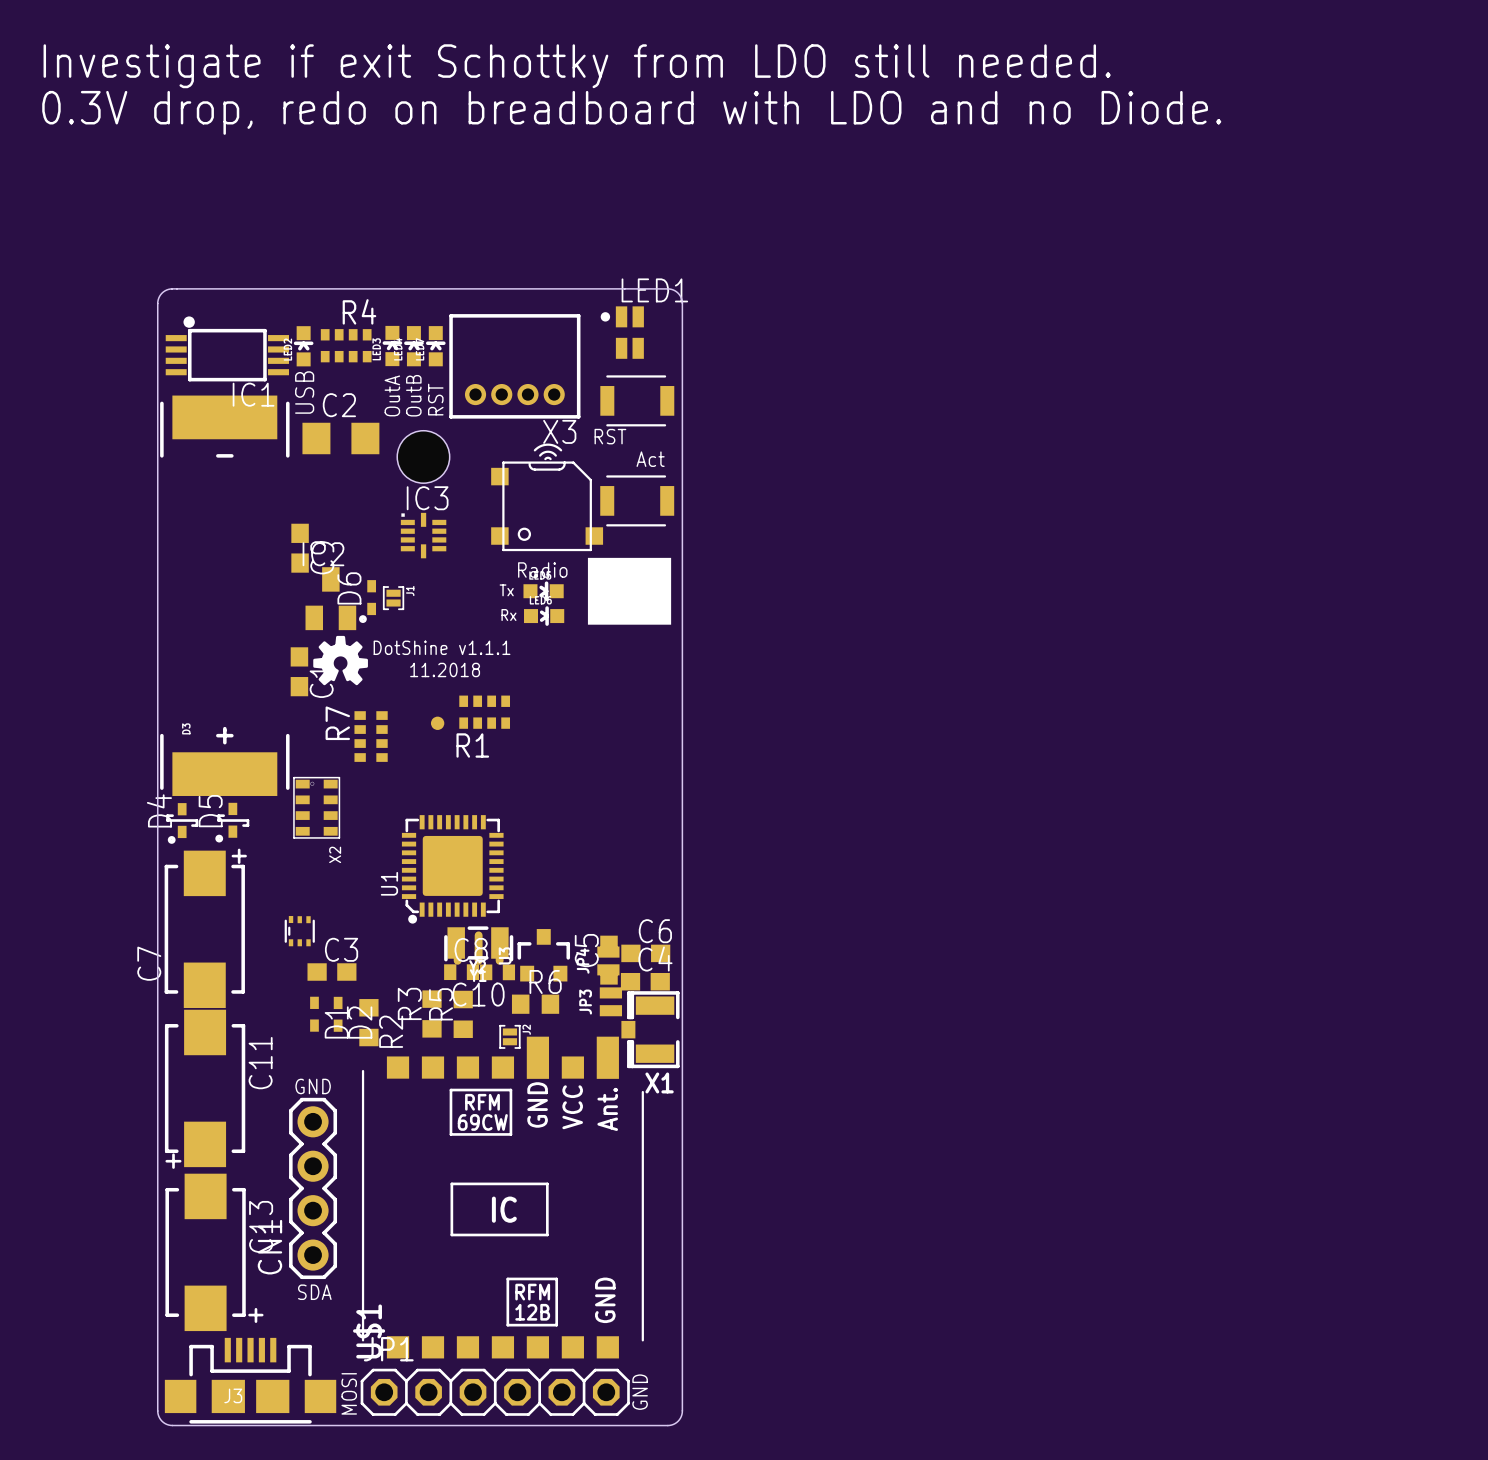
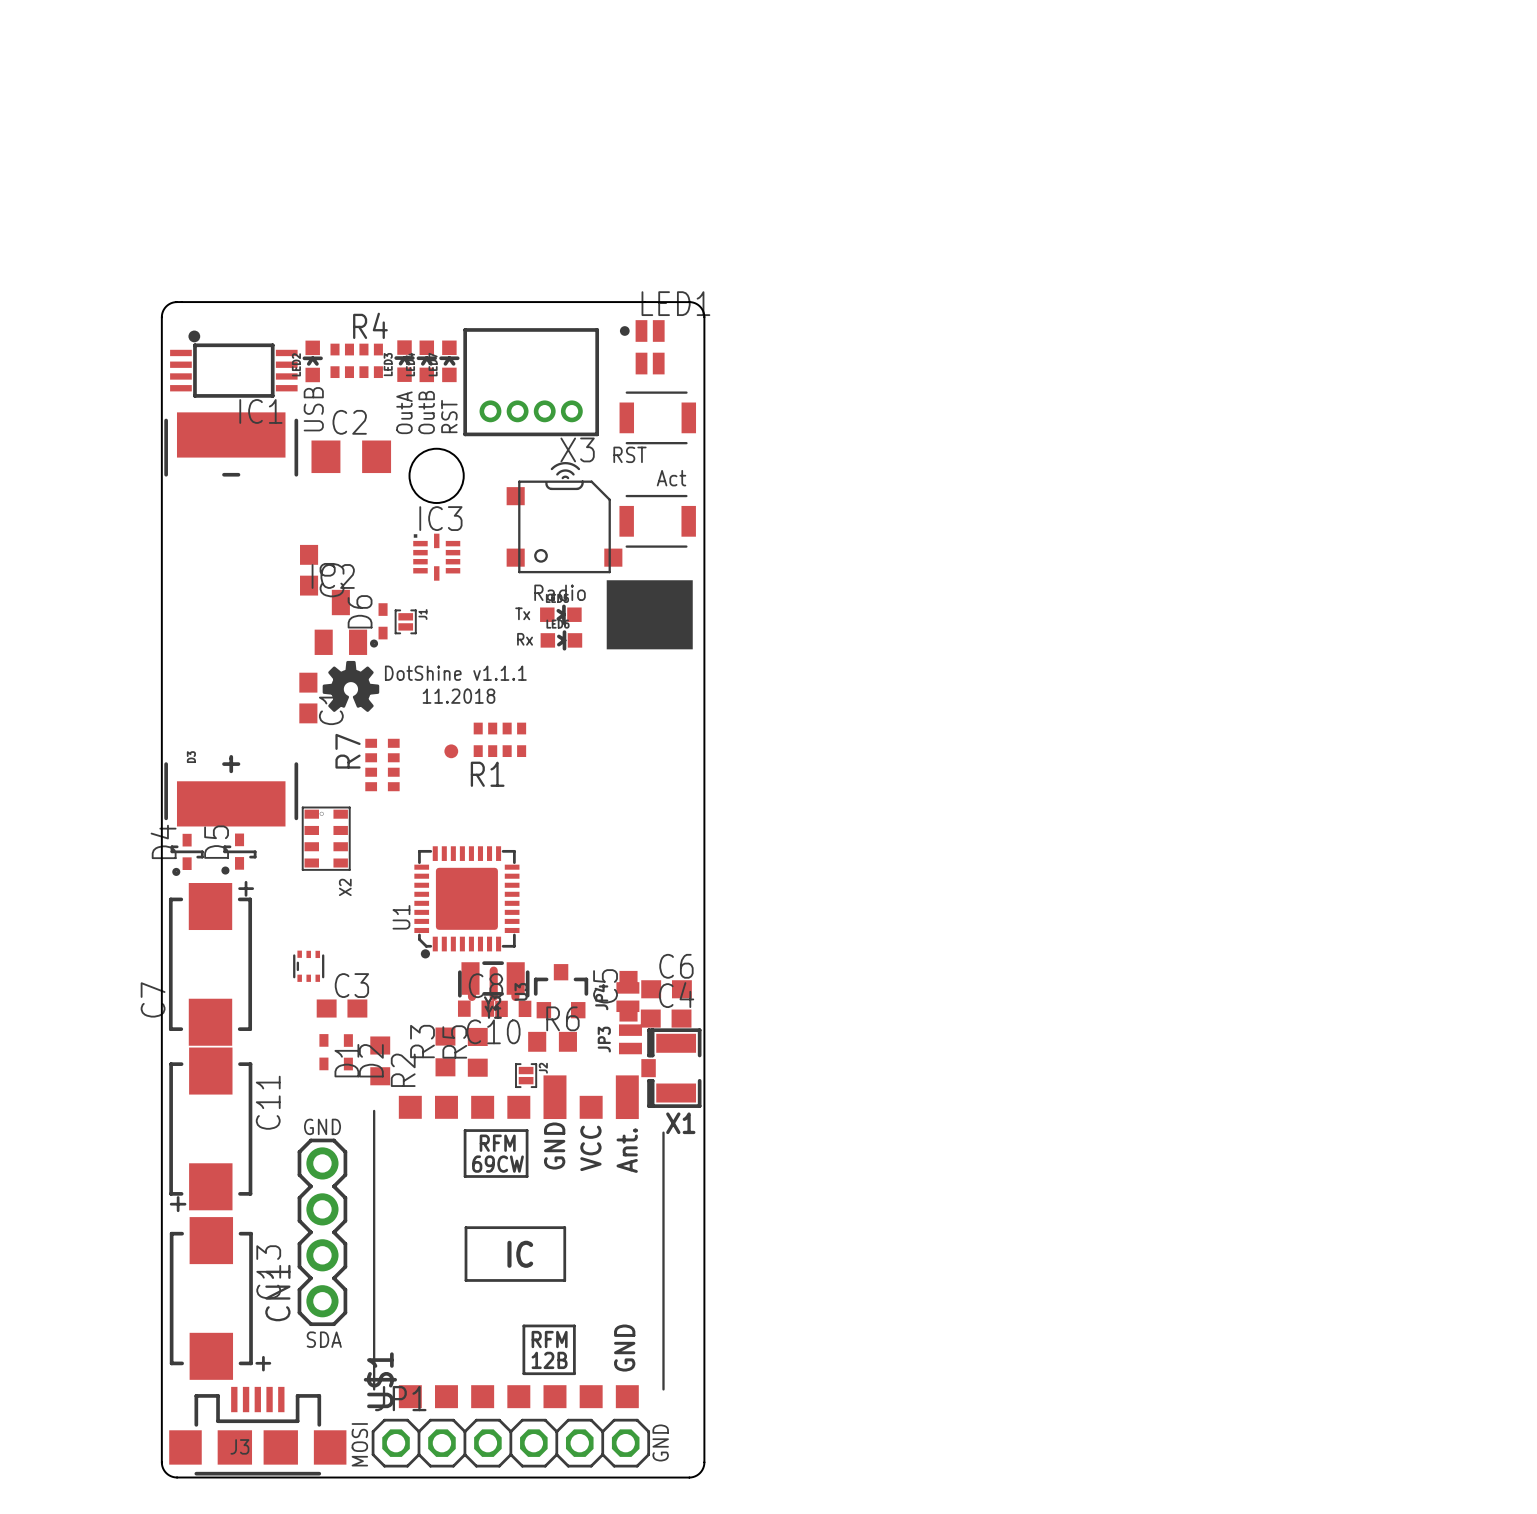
text: Investigate if exit Schottky from LDO still needed. (577, 66) -> none
text: 0.3V drop, redo on breadboard with LDO and no Diode. (631, 112) -> none

